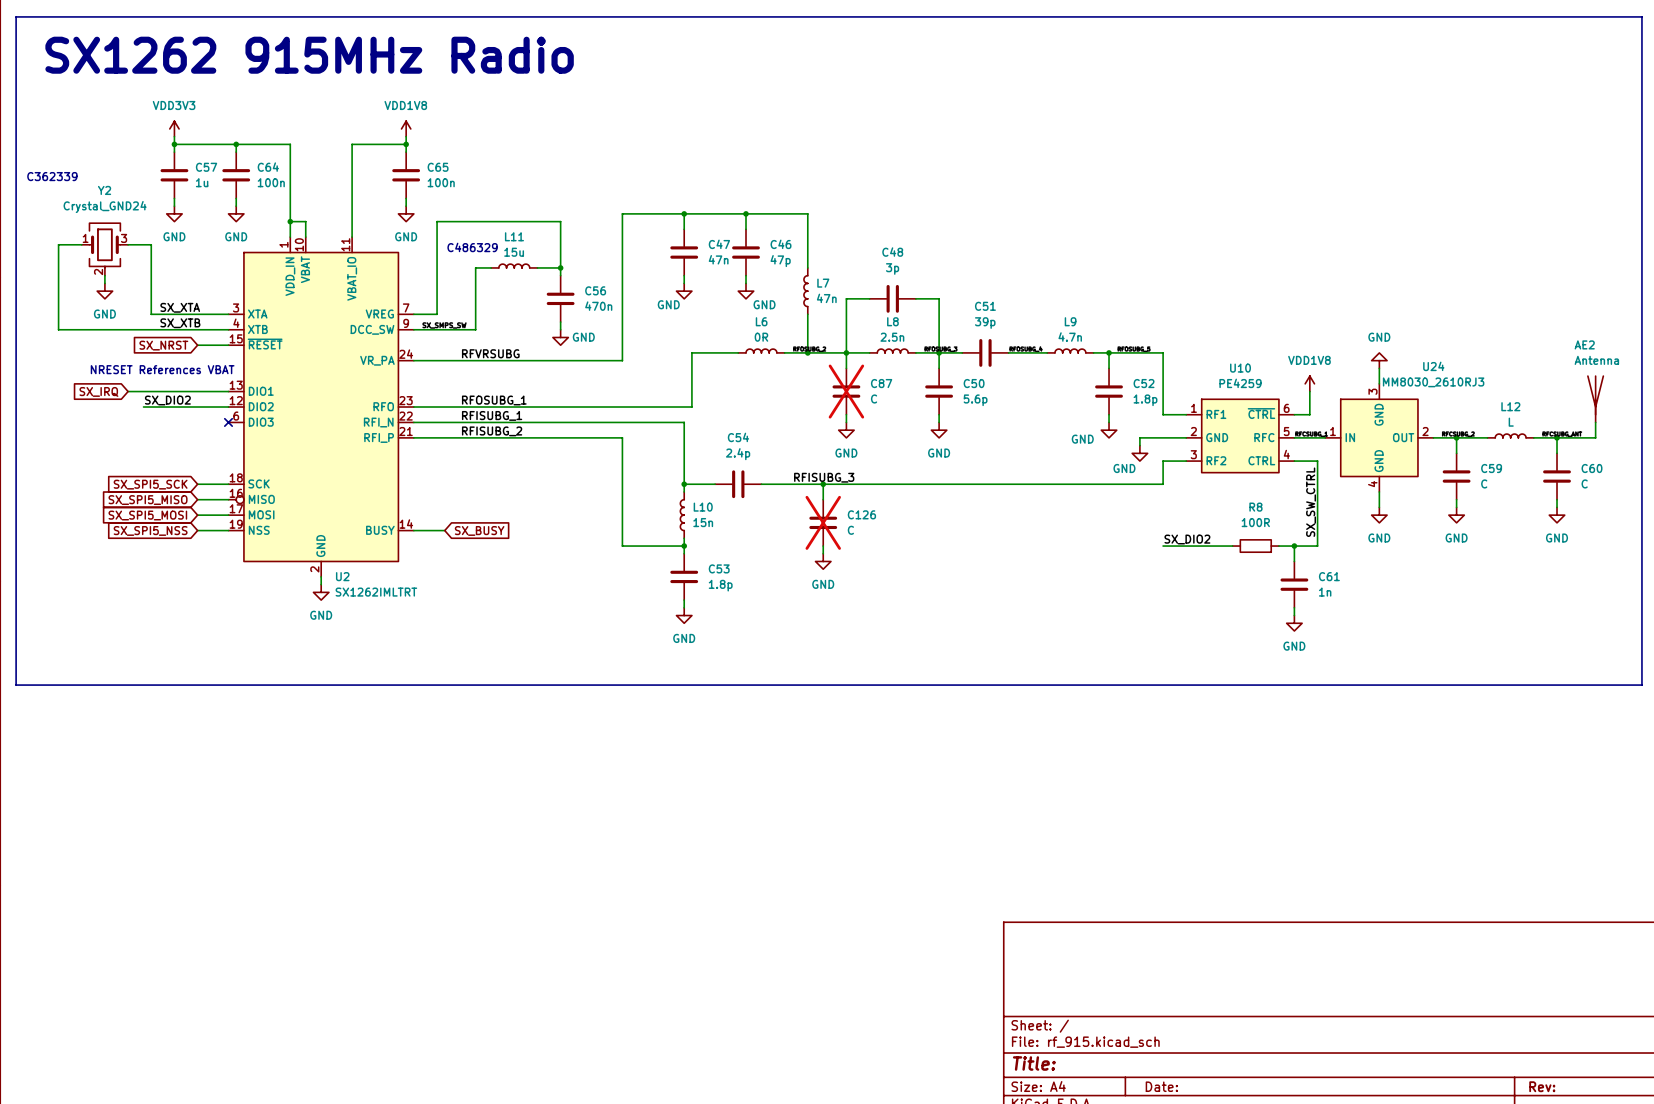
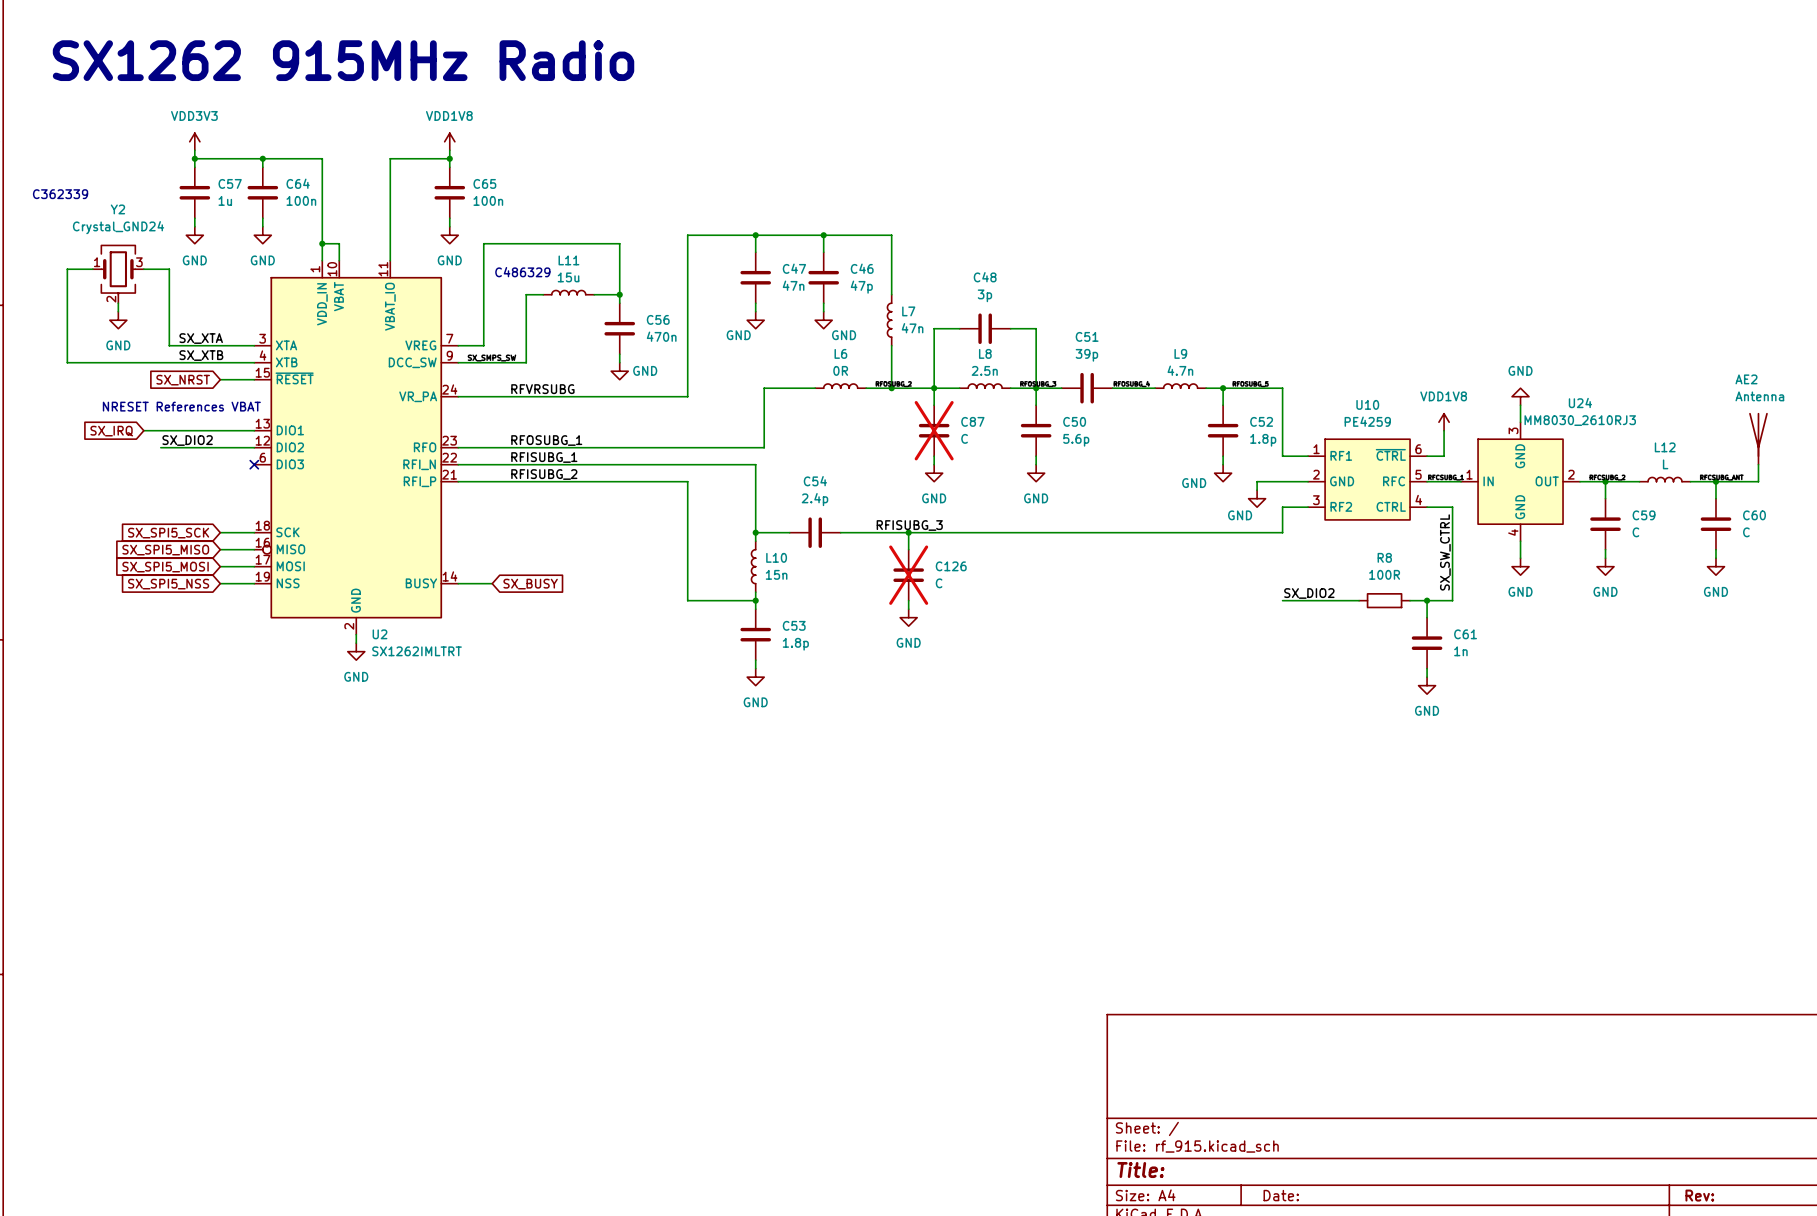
line: (16, 16) (1641, 16) (1641, 685) (16, 685) (16, 16) -> none

